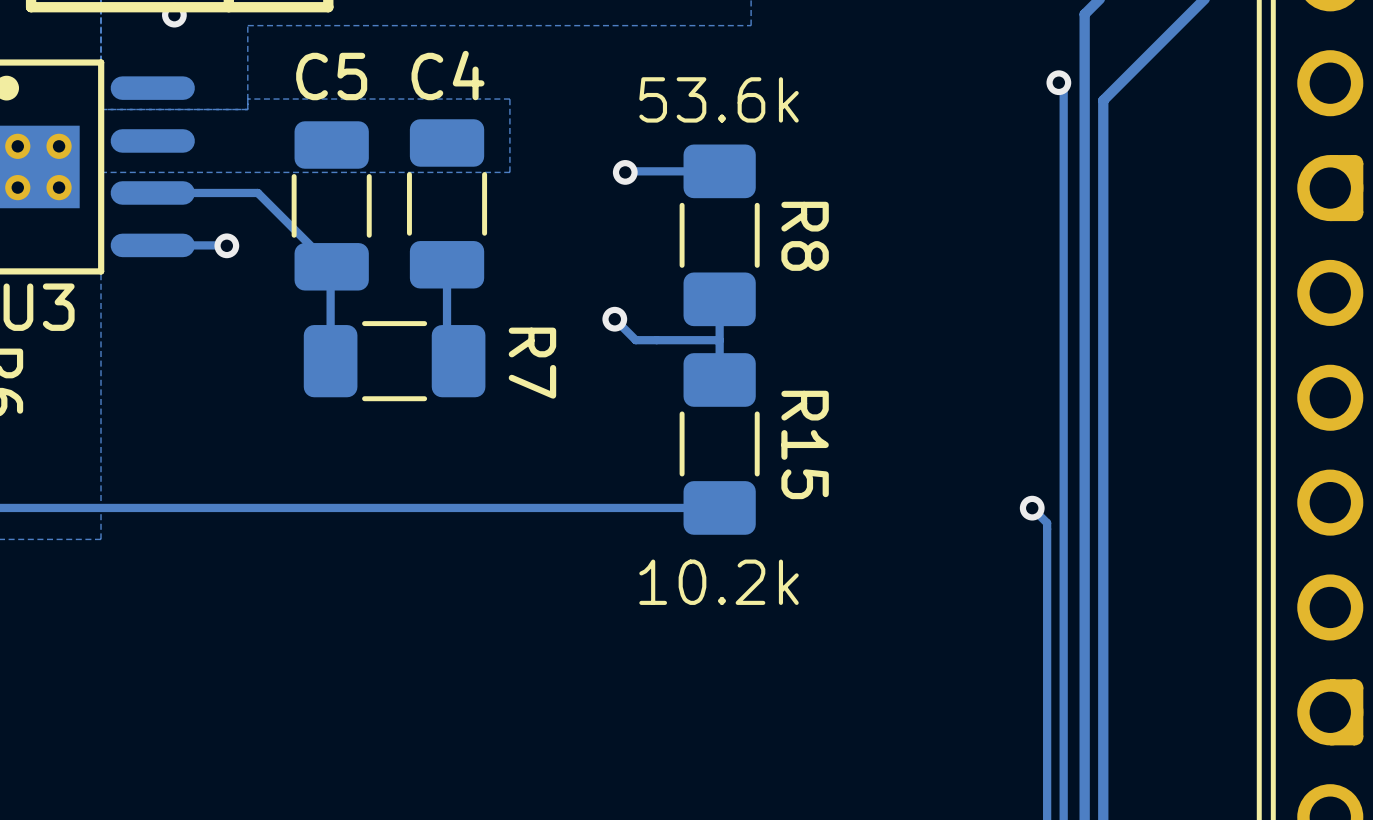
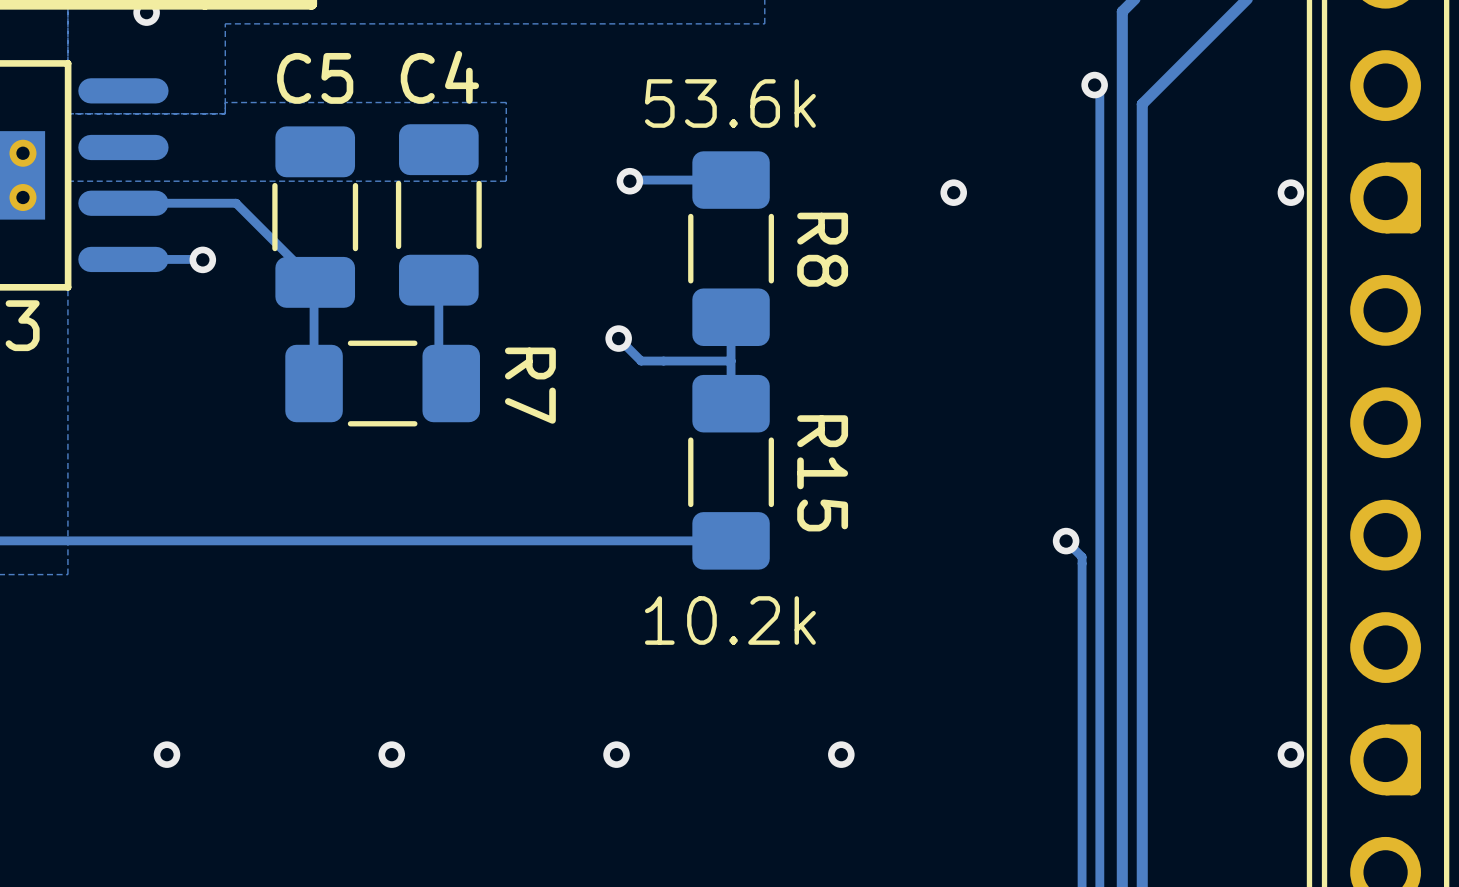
via: none -> (953, 192)
via: none -> (1290, 192)
via: none -> (166, 754)
via: none -> (391, 754)
via: none -> (616, 754)
via: none -> (841, 754)
via: none -> (1290, 754)

